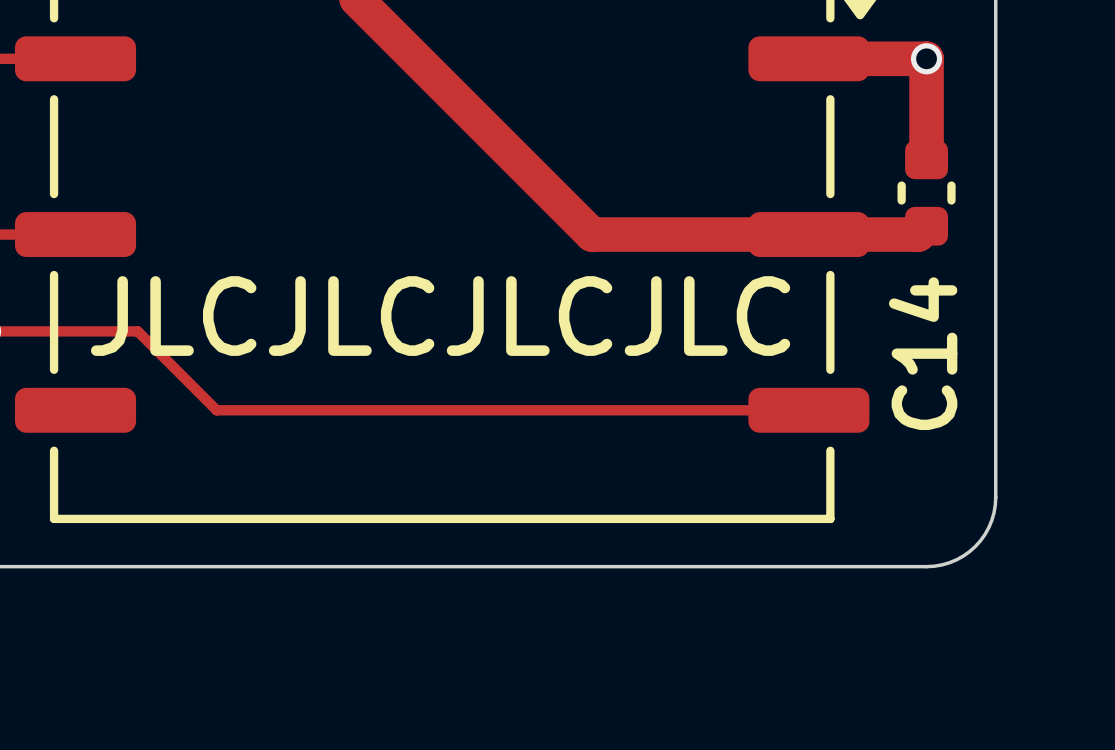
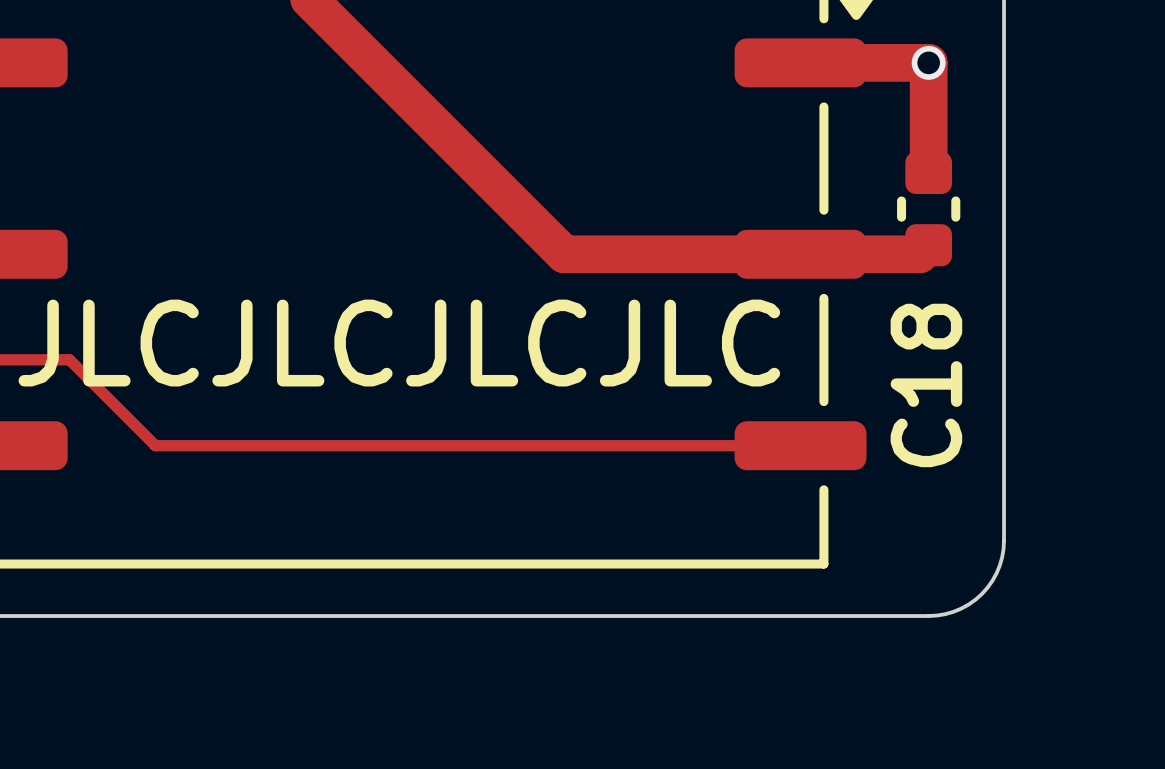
C14 name: C14 (923, 353) -> C18 (926, 385)

